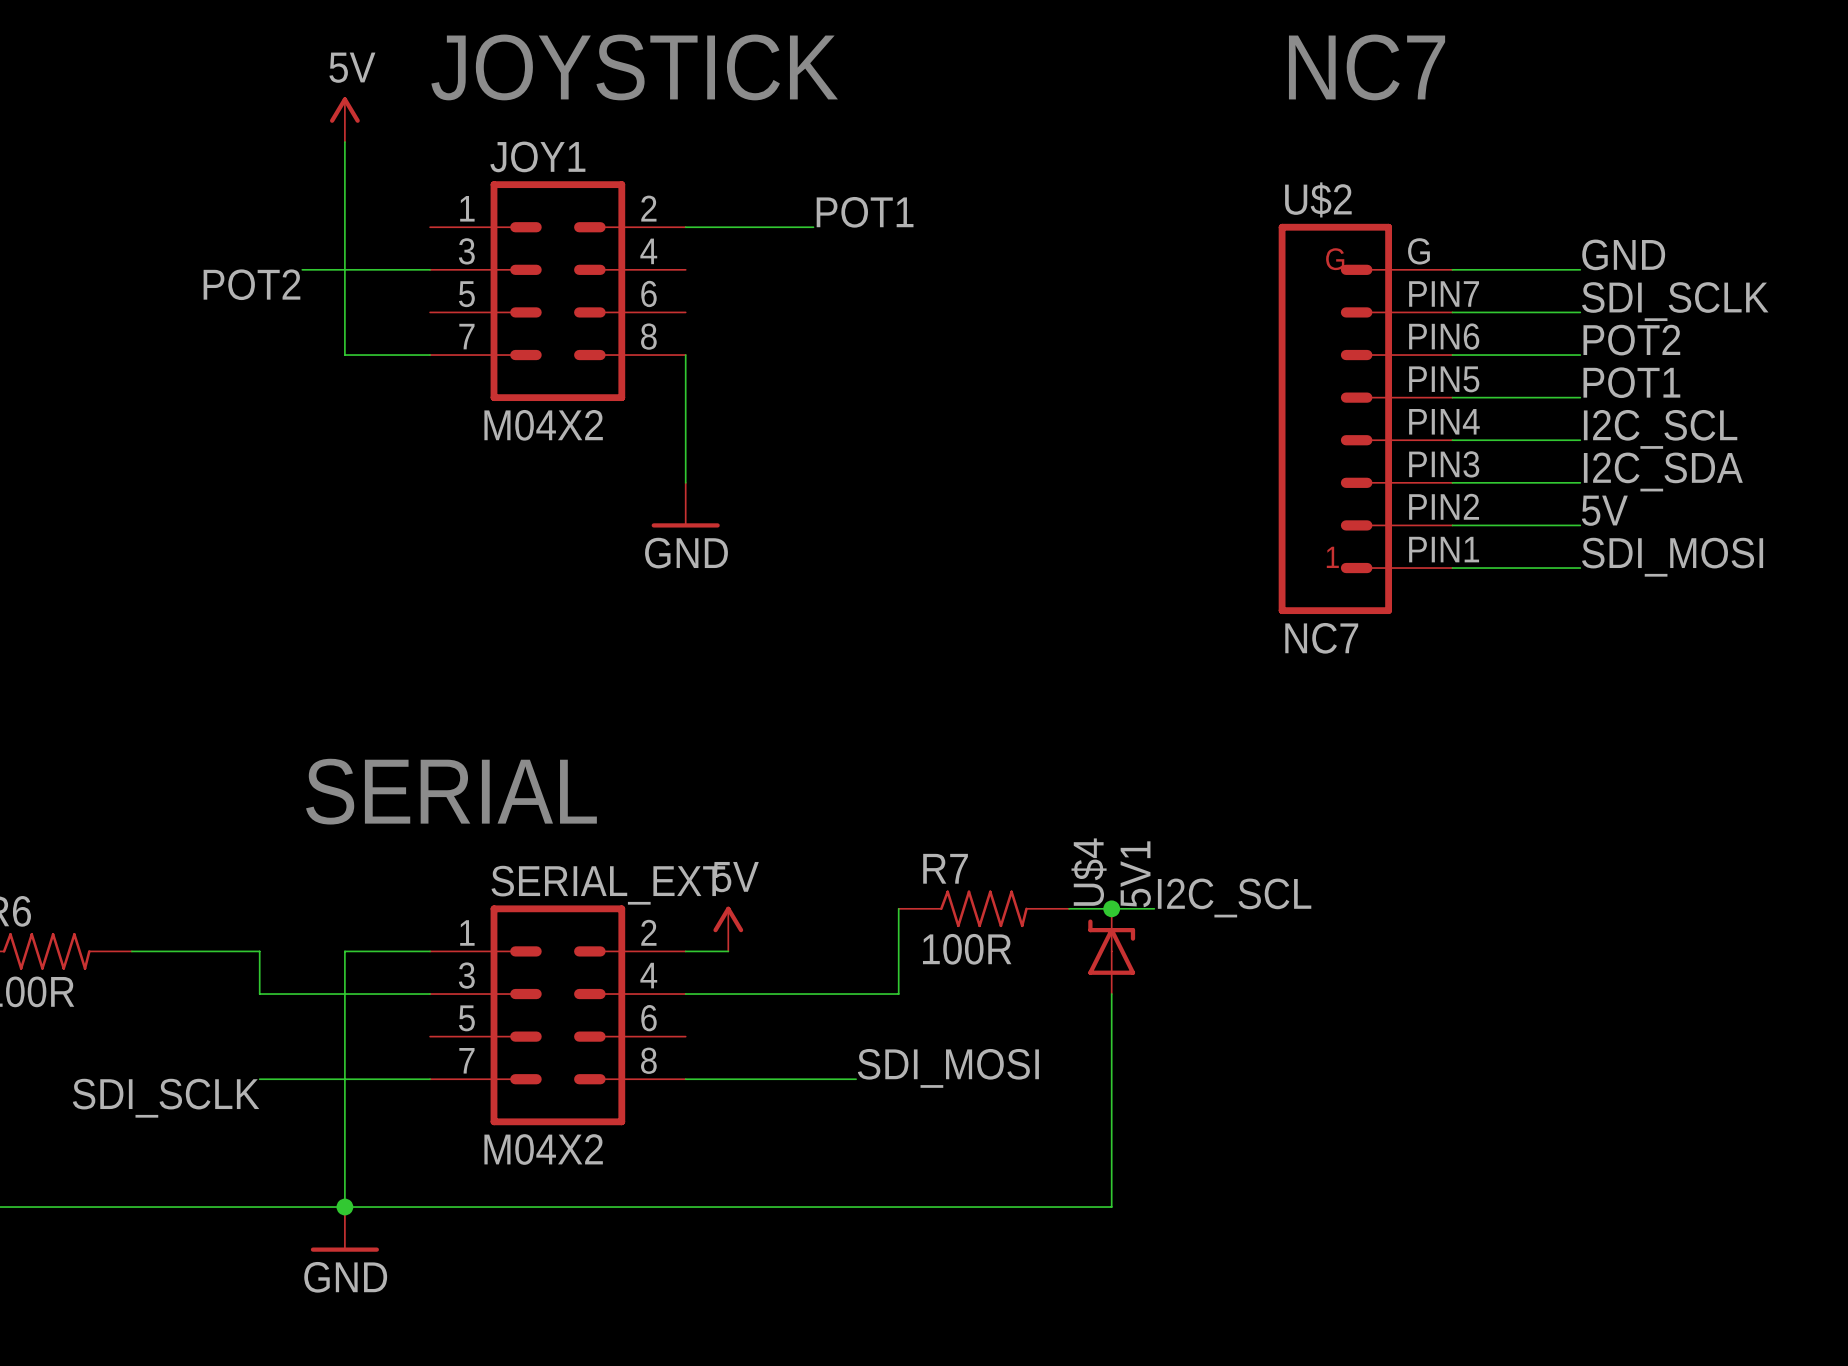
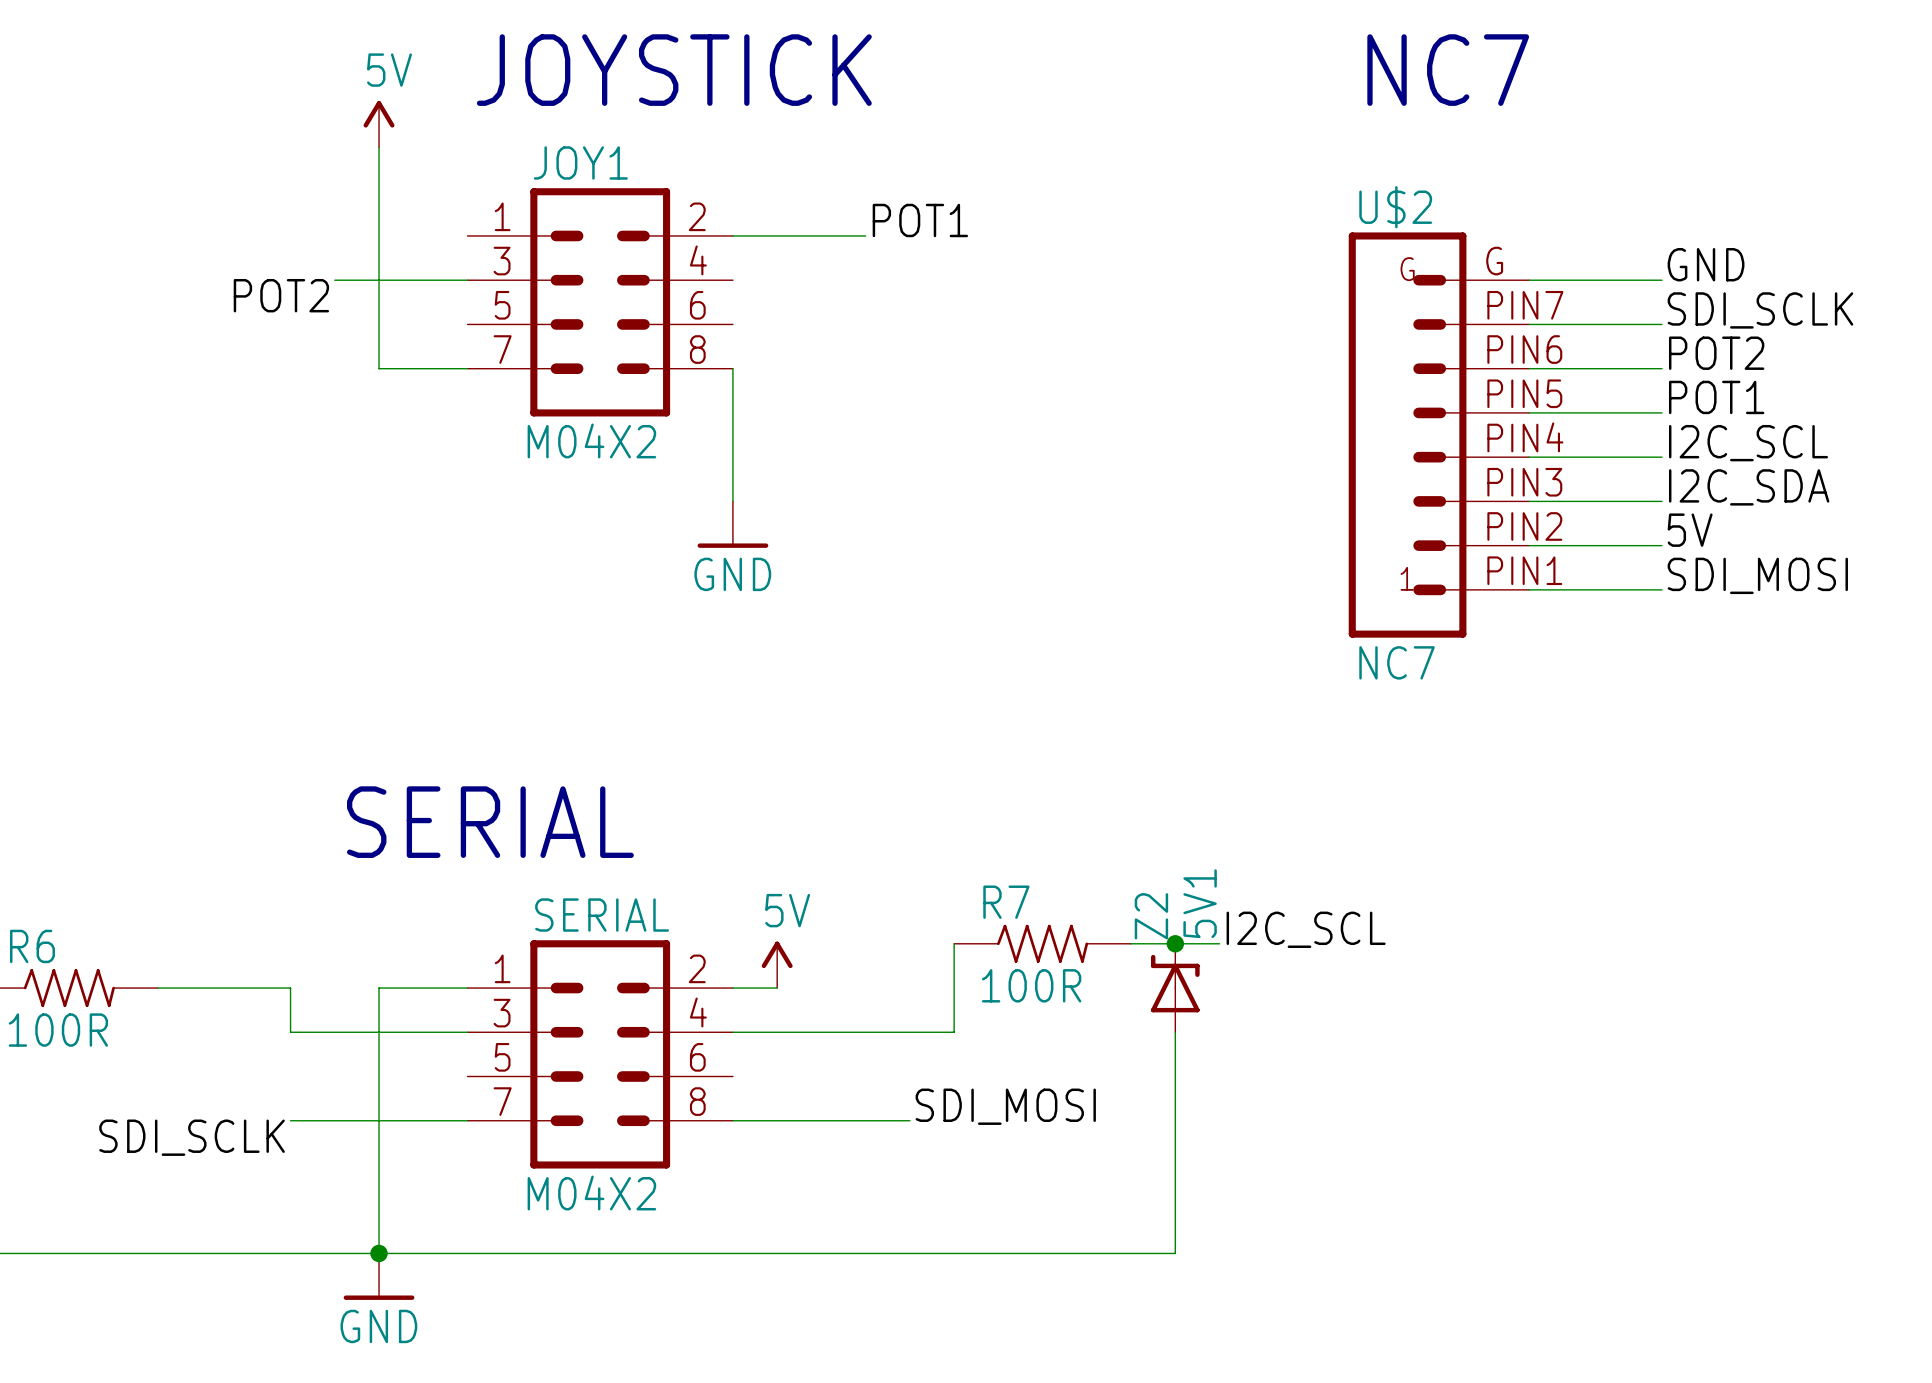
U$4 name: U$4 (1089, 872) -> Z2 (1151, 916)
SERIAL_EXT name: SERIAL_EXT (608, 885) -> SERIAL (602, 915)

